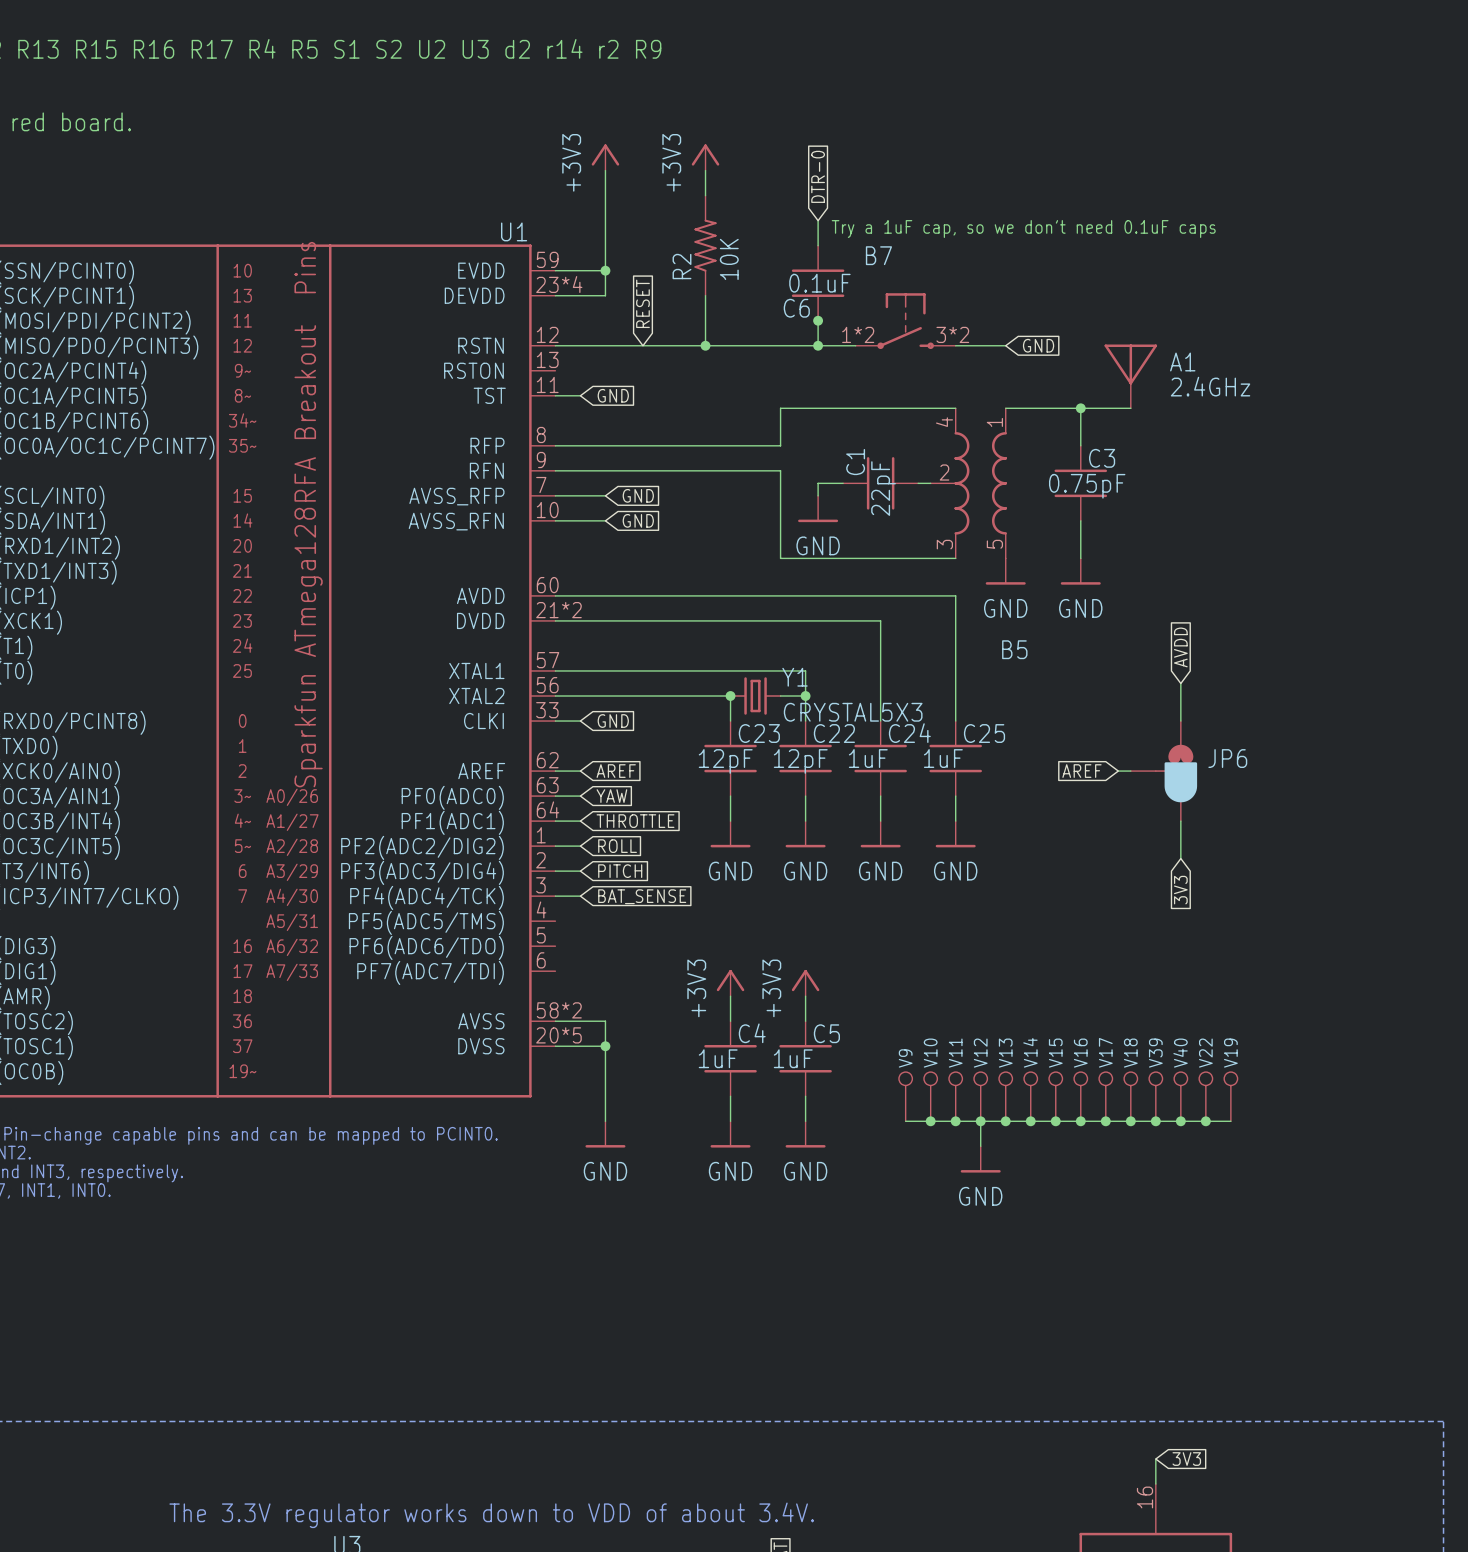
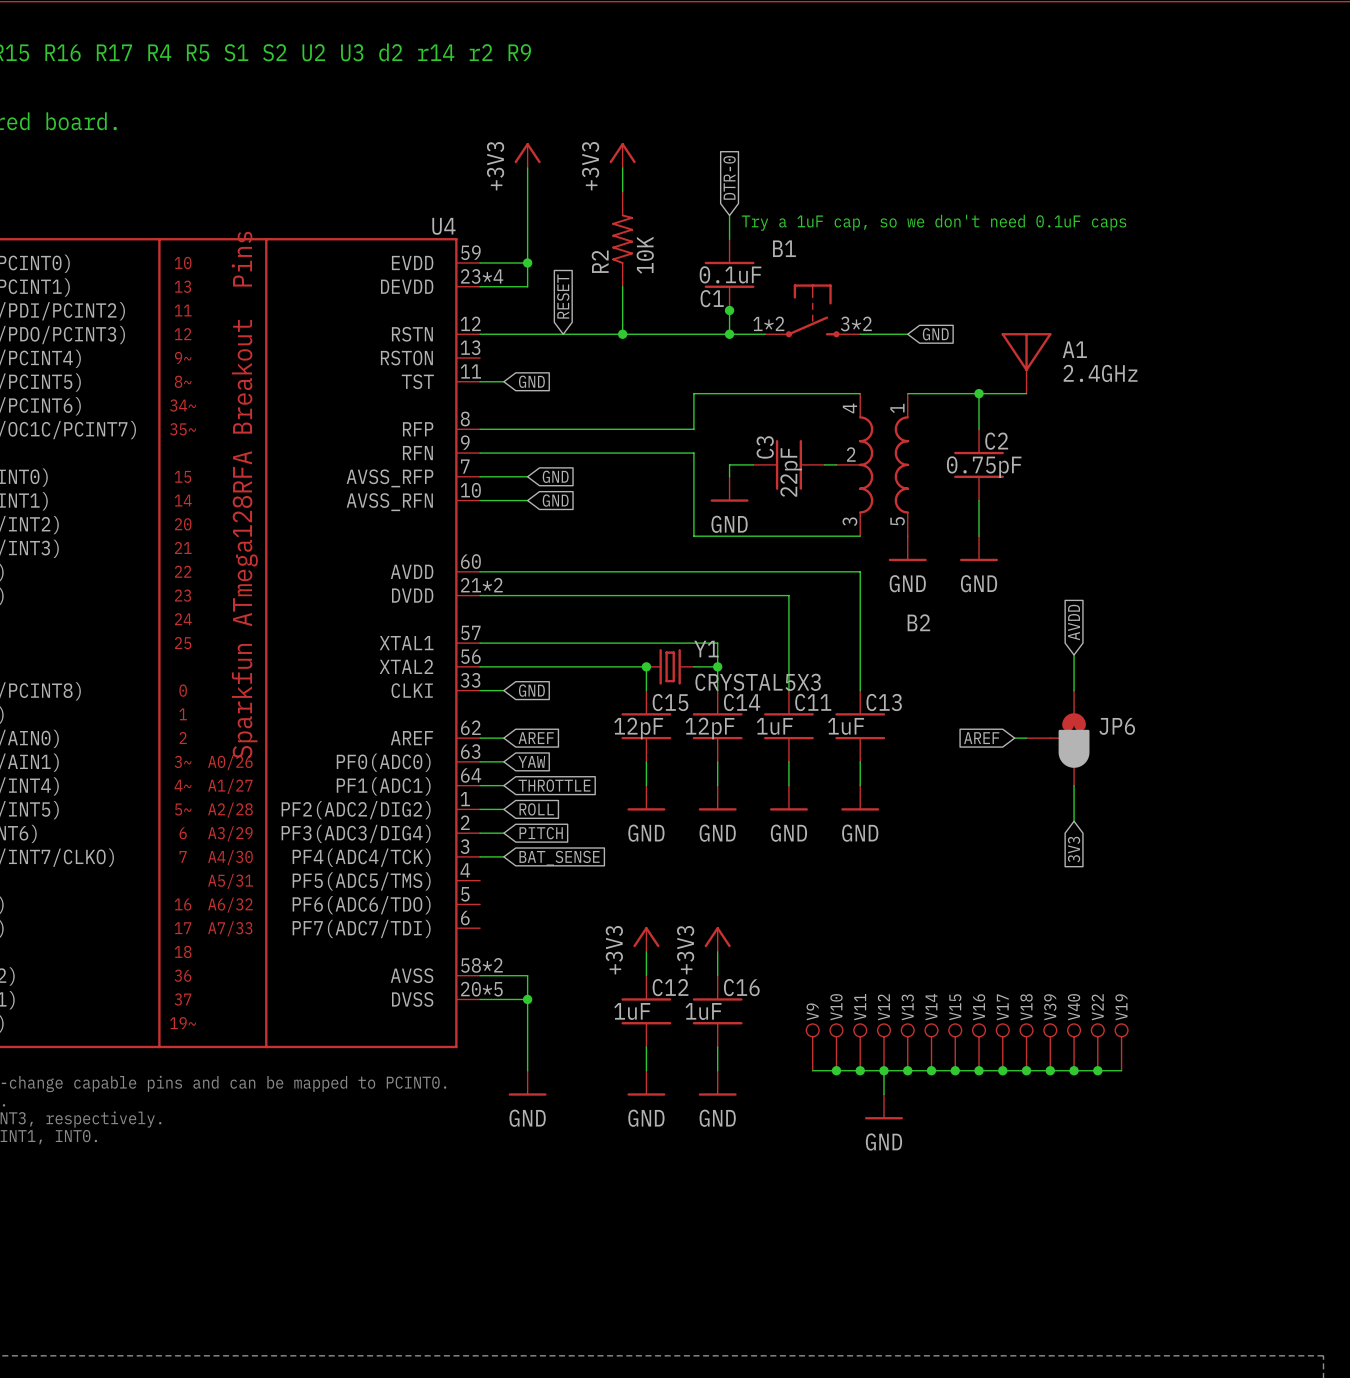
U1 name: U1 (514, 231) -> U4 (443, 226)
B7 name: B7 (878, 255) -> B1 (784, 248)
C6 name: C6 (796, 308) -> C1 (712, 298)
C3 name: C3 (1102, 458) -> C2 (996, 441)
C1 name: C1 (855, 462) -> C3 (765, 447)
B5 name: B5 (1014, 649) -> B2 (918, 622)
C23 name: C23 (759, 733) -> C15 (670, 702)
C22 name: C22 (834, 733) -> C14 (742, 702)
C24 name: C24 (909, 733) -> C11 (813, 702)
C25 name: C25 (984, 733) -> C13 (884, 702)
C4 name: C4 (752, 1033) -> C12 (670, 987)
C5 name: C5 (826, 1033) -> C16 (741, 987)

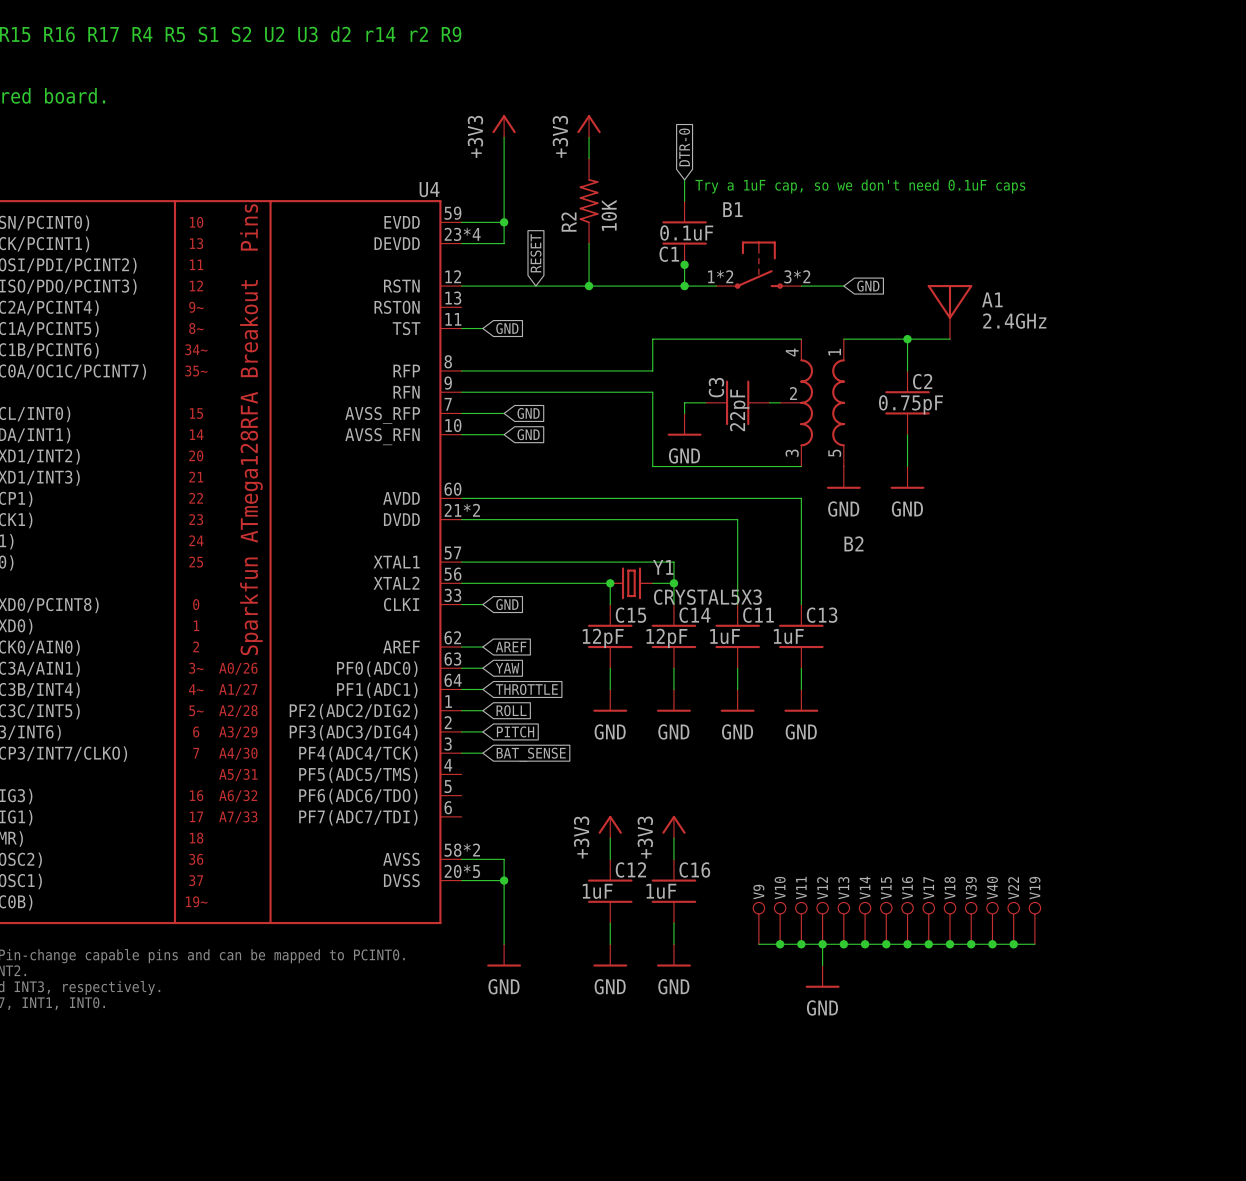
global label: AVDD (1074, 622) -> none
wire: (1074, 654) (1074, 690) -> none
global label: AREF (981, 738) -> none
wire: (1014, 738) (1026, 738) -> none
JP6: (1058, 738) -> none
wire: (1074, 785) (1074, 821) -> none
global label: 3V3 (1074, 849) -> none

